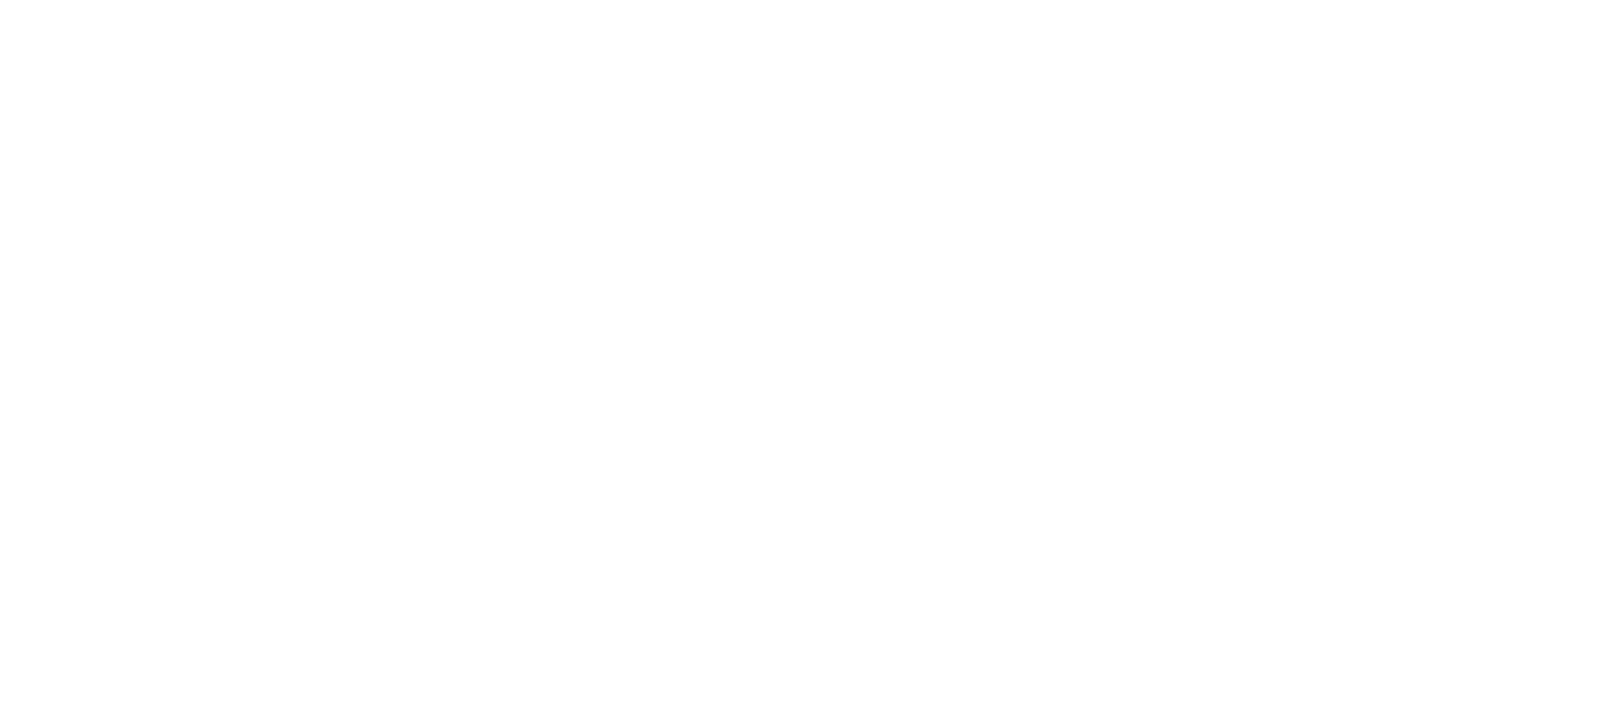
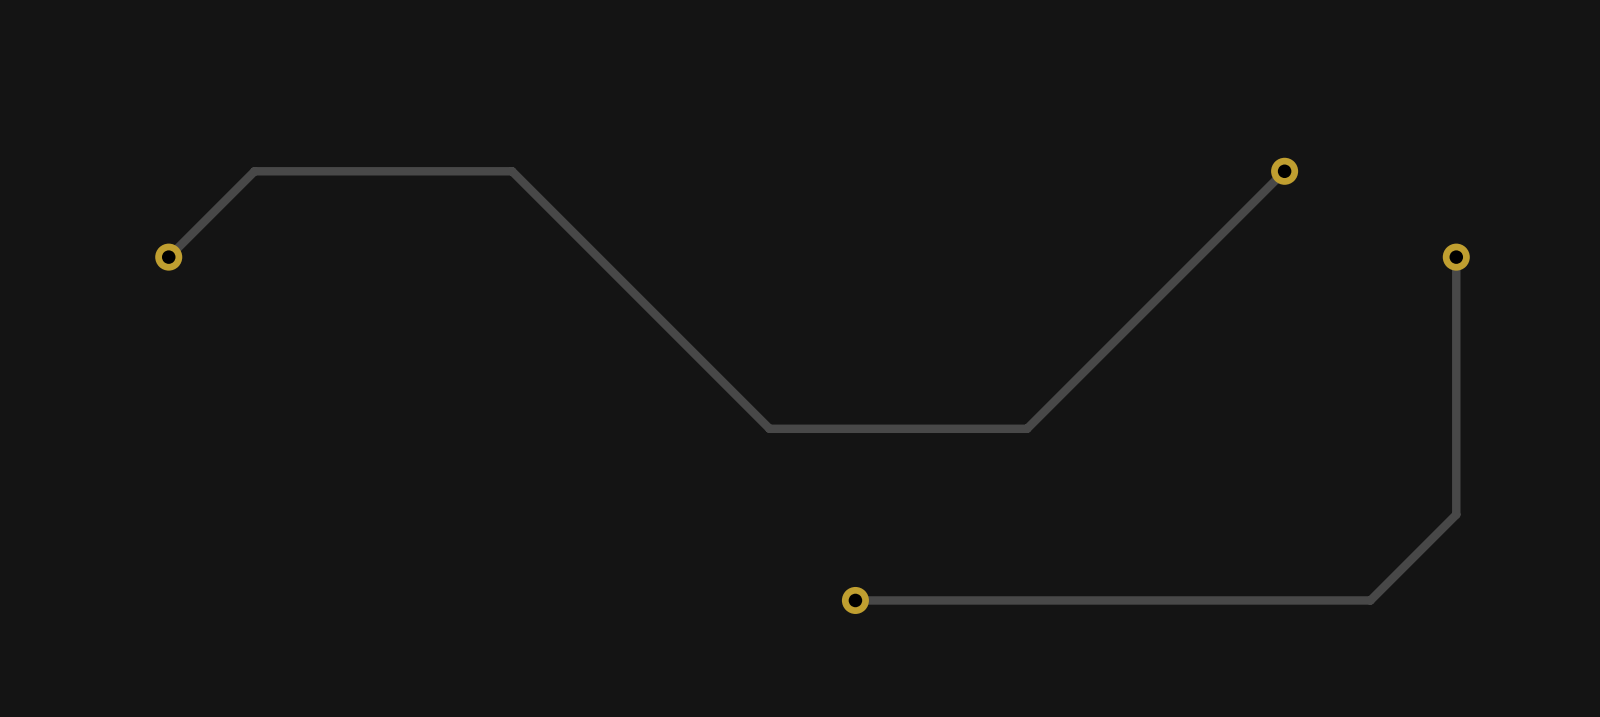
track: none -> (1284, 171) (1027, 428) (769, 428) (512, 171) (254, 171) (168, 257)
via: none -> (1284, 171)
via: none -> (168, 257)
track: none -> (1456, 257) (1456, 514) (1370, 600) (855, 600)
via: none -> (1456, 257)
via: none -> (855, 600)

